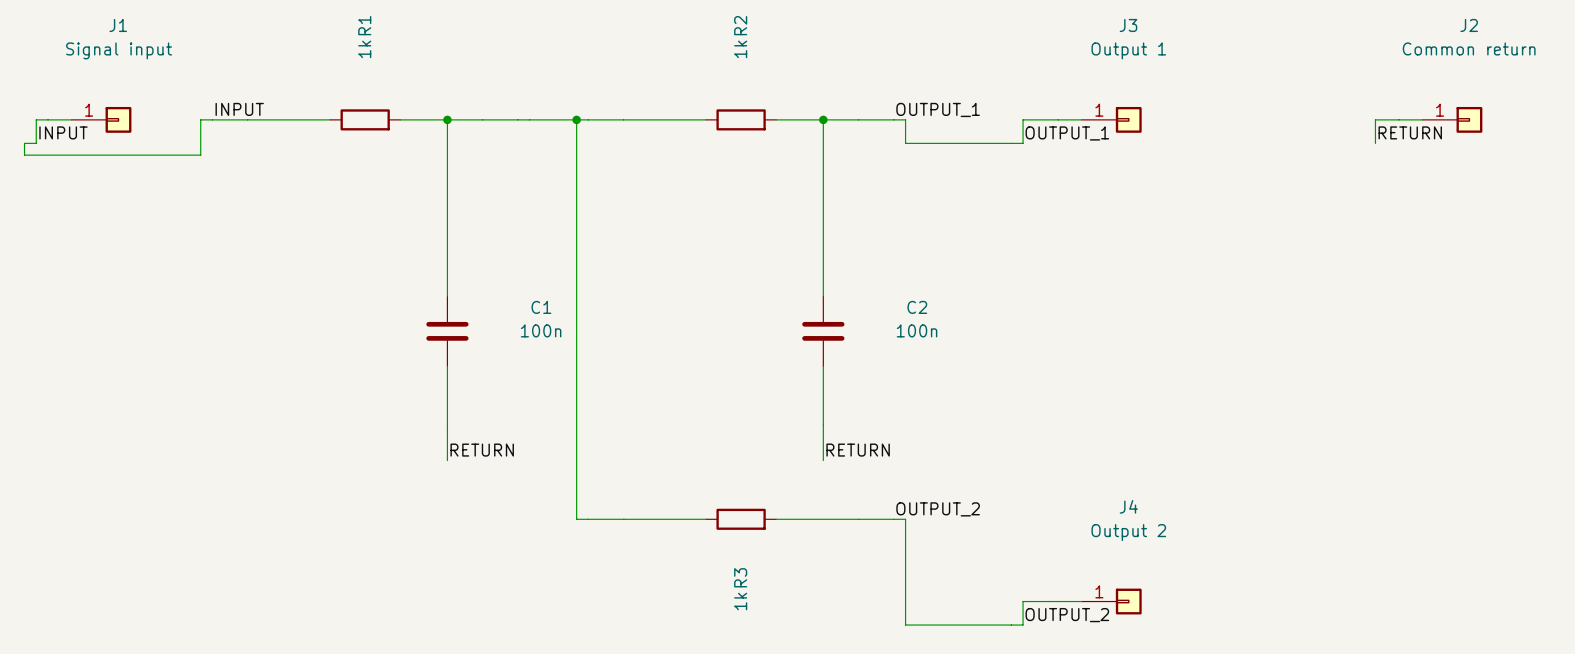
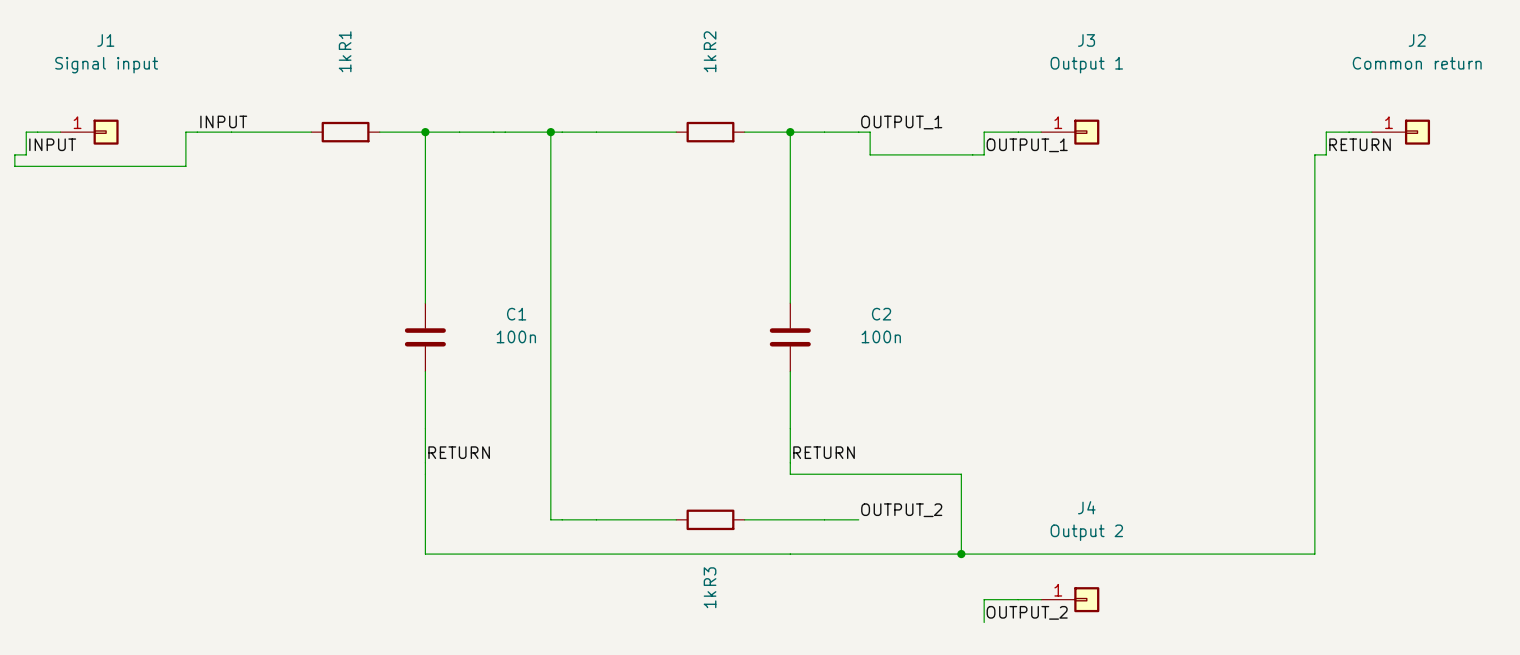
wire: none -> (1326, 154) (1314, 154) (1314, 554) (425, 554) (425, 462)
wire: none -> (790, 462) (790, 474) (961, 474) (961, 554)
wire: (893, 519) (905, 519) (905, 625) (1023, 625) -> none
junction: none -> (961, 554)

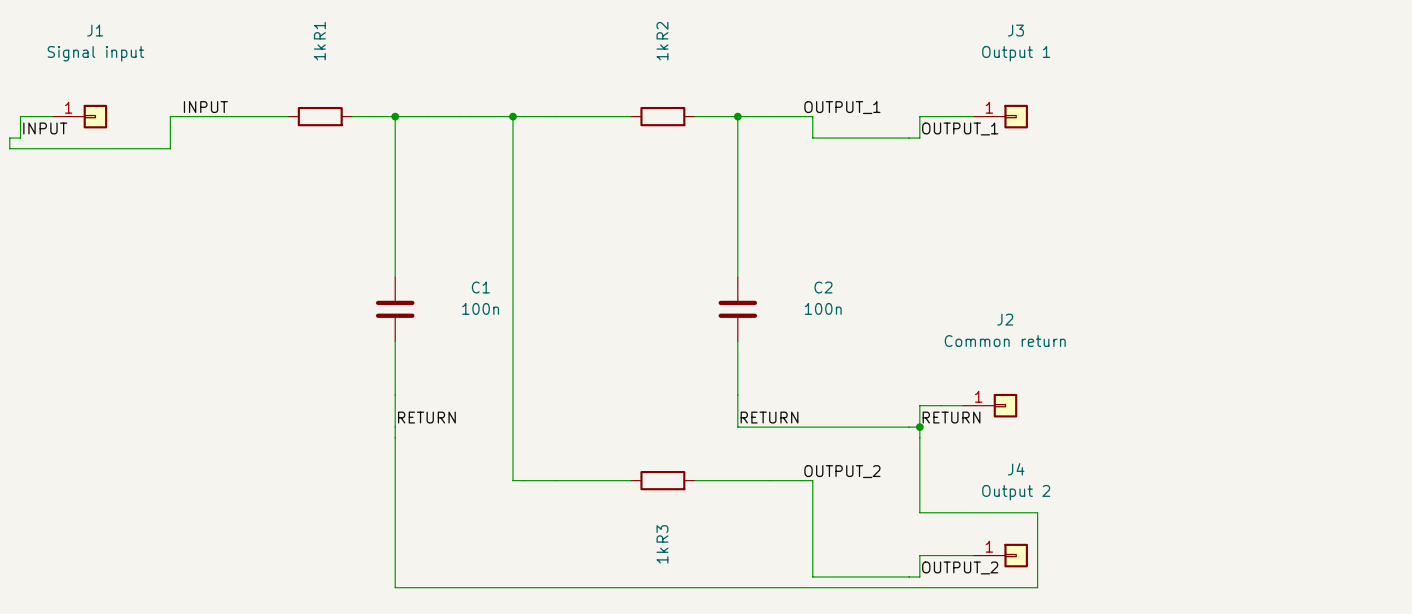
wire: (1371, 132) (1326, 132) (1326, 154) (1314, 154) (1314, 554) (1109, 554) -> none
J2 position: (1400, 132) -> (989, 405)
label: RETURN (1360, 144) -> none
wire: none -> (962, 405) (919, 405) (919, 512)
label: none -> RETURN (951, 417)
wire: (790, 462) (790, 474) (961, 474) (961, 554) -> (737, 427) (919, 427)
junction: none -> (919, 427)
wire: none -> (802, 480) (812, 480) (812, 577) (919, 577)
wire: (425, 554) (984, 554) -> (395, 512) (395, 587) (1037, 587) (1037, 512)
junction: (961, 554) -> none

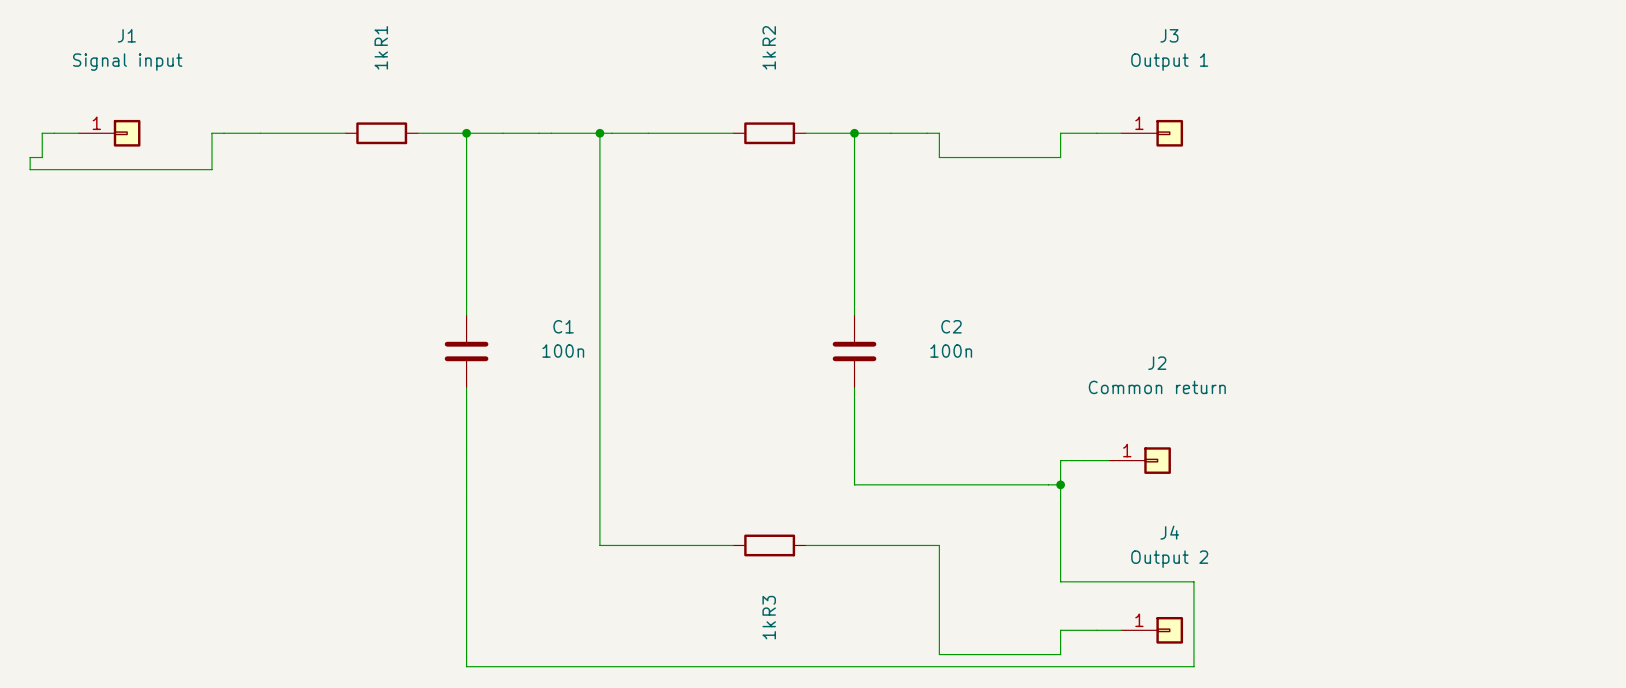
label: INPUT (205, 107) -> none
label: OUTPUT_1 (842, 107) -> none
label: INPUT (45, 128) -> none
label: OUTPUT_1 (960, 128) -> none
label: RETURN (426, 417) -> none
label: RETURN (769, 417) -> none
label: RETURN (951, 417) -> none
label: OUTPUT_2 (842, 471) -> none
label: OUTPUT_2 (960, 567) -> none

